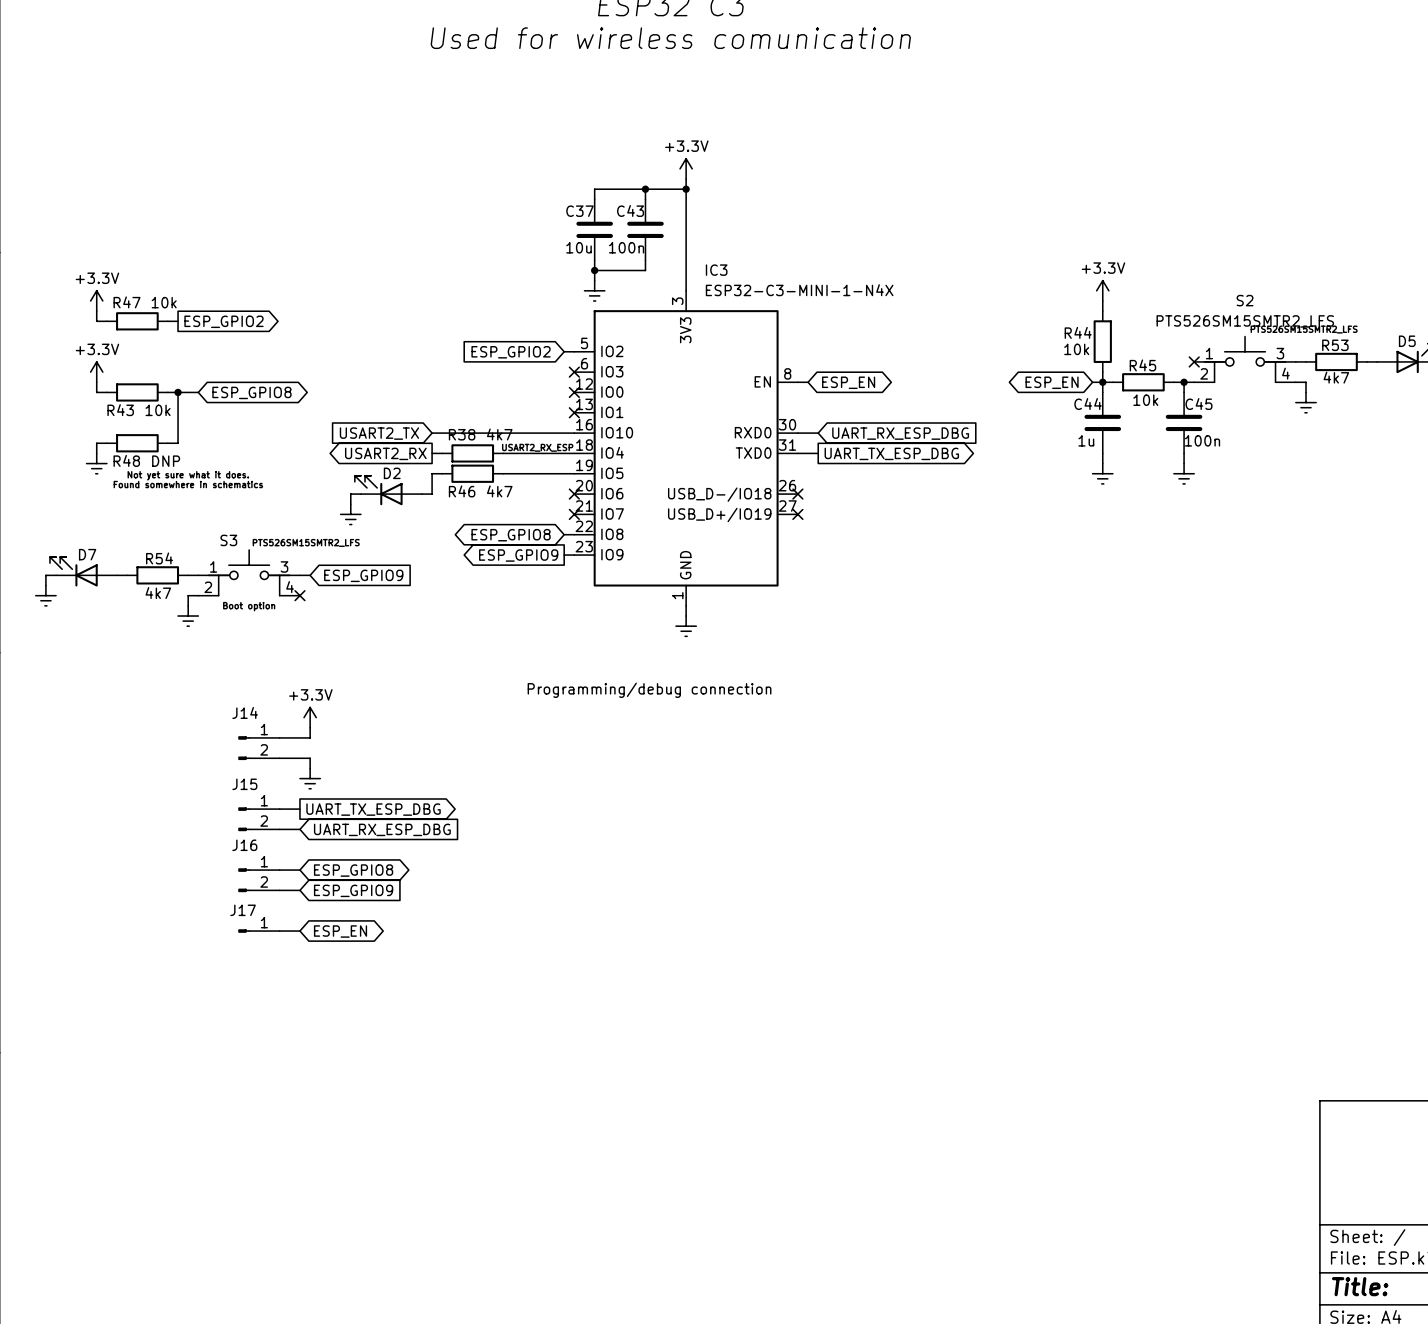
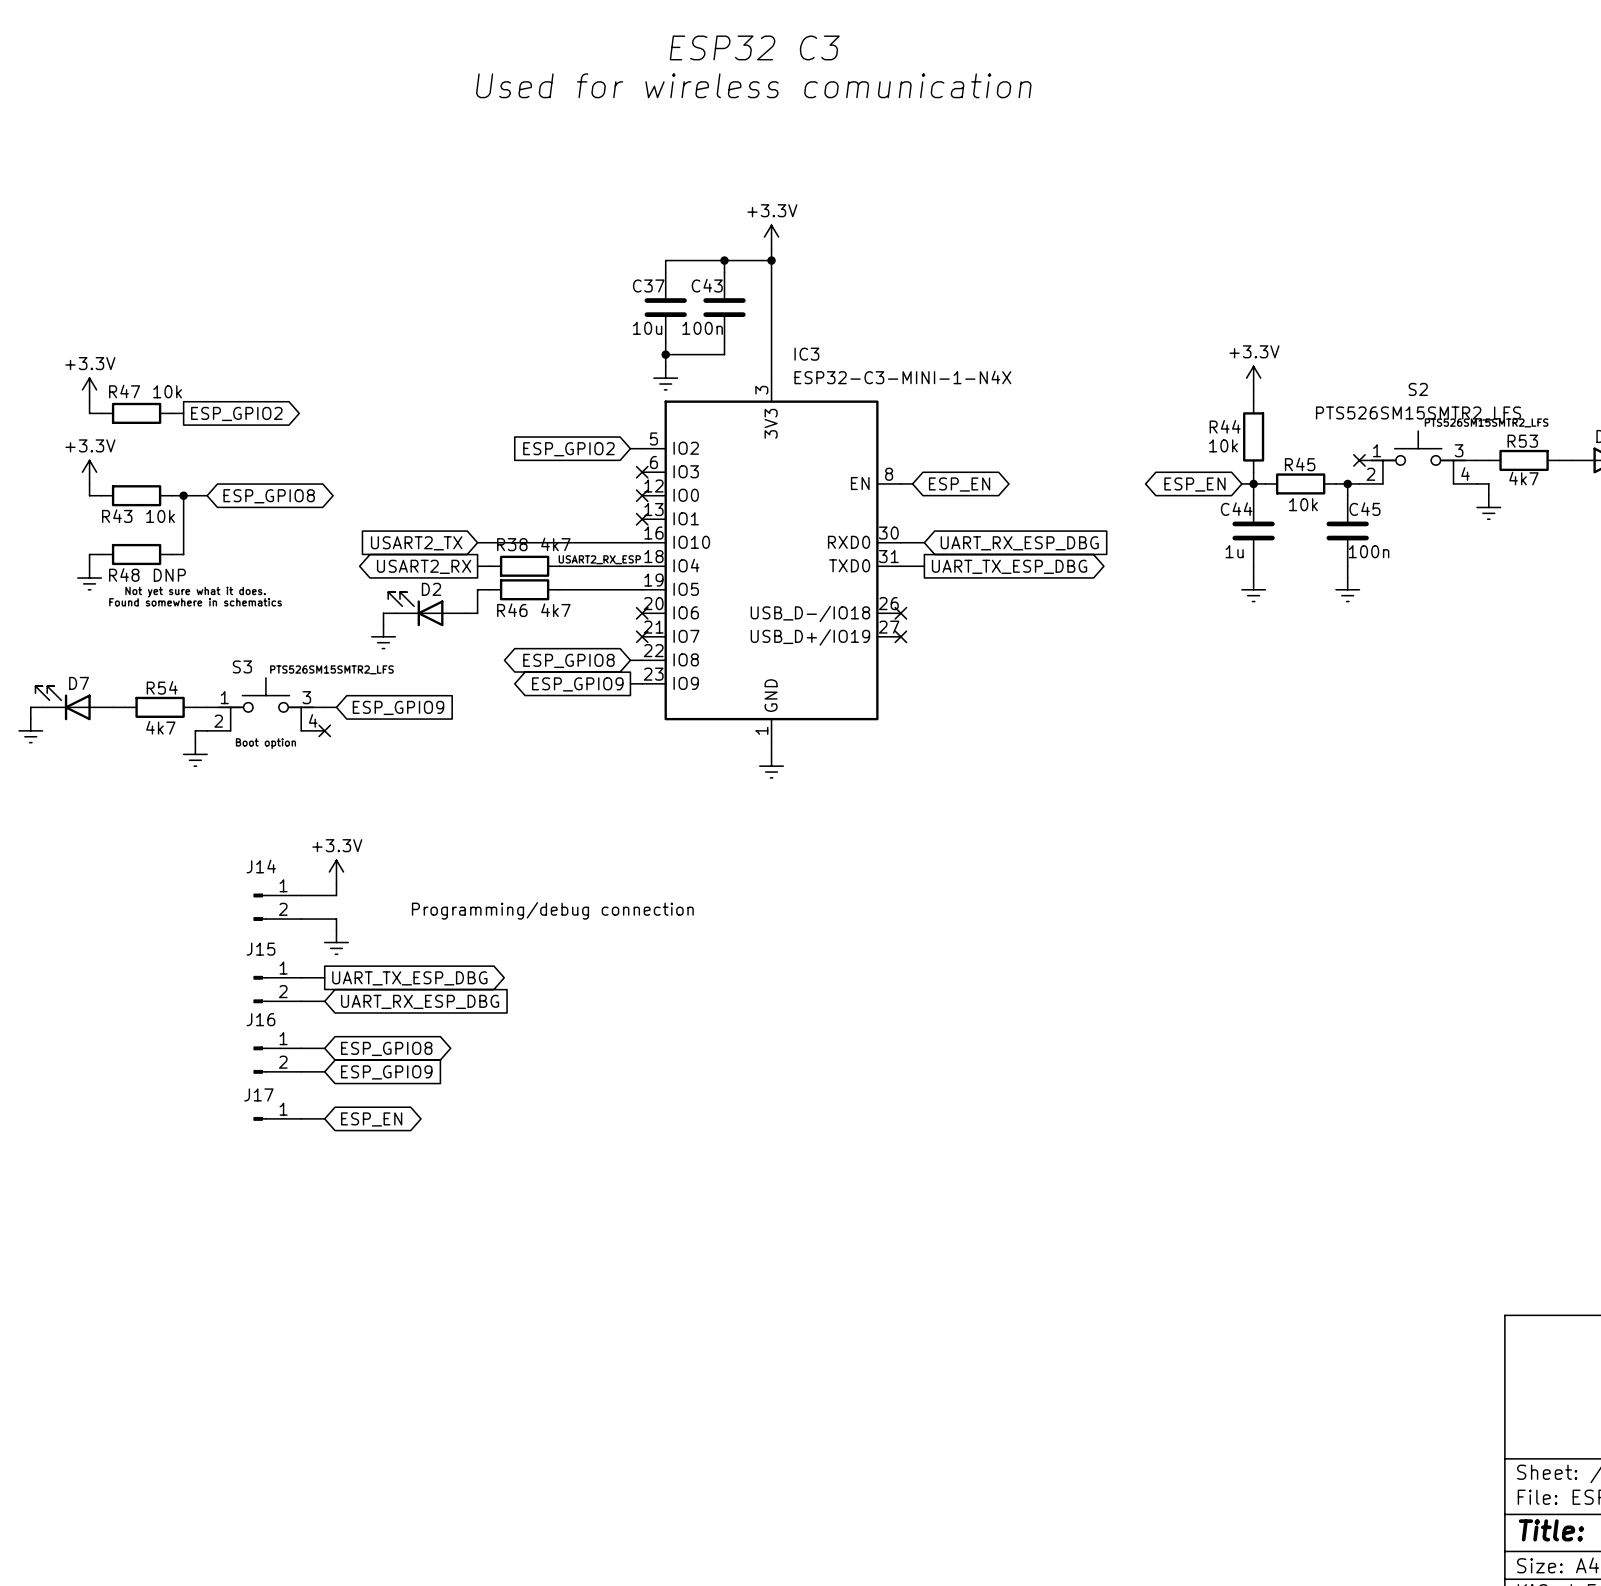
text position: Programming/debug connection (649, 690) -> Programming/debug connection (552, 910)

